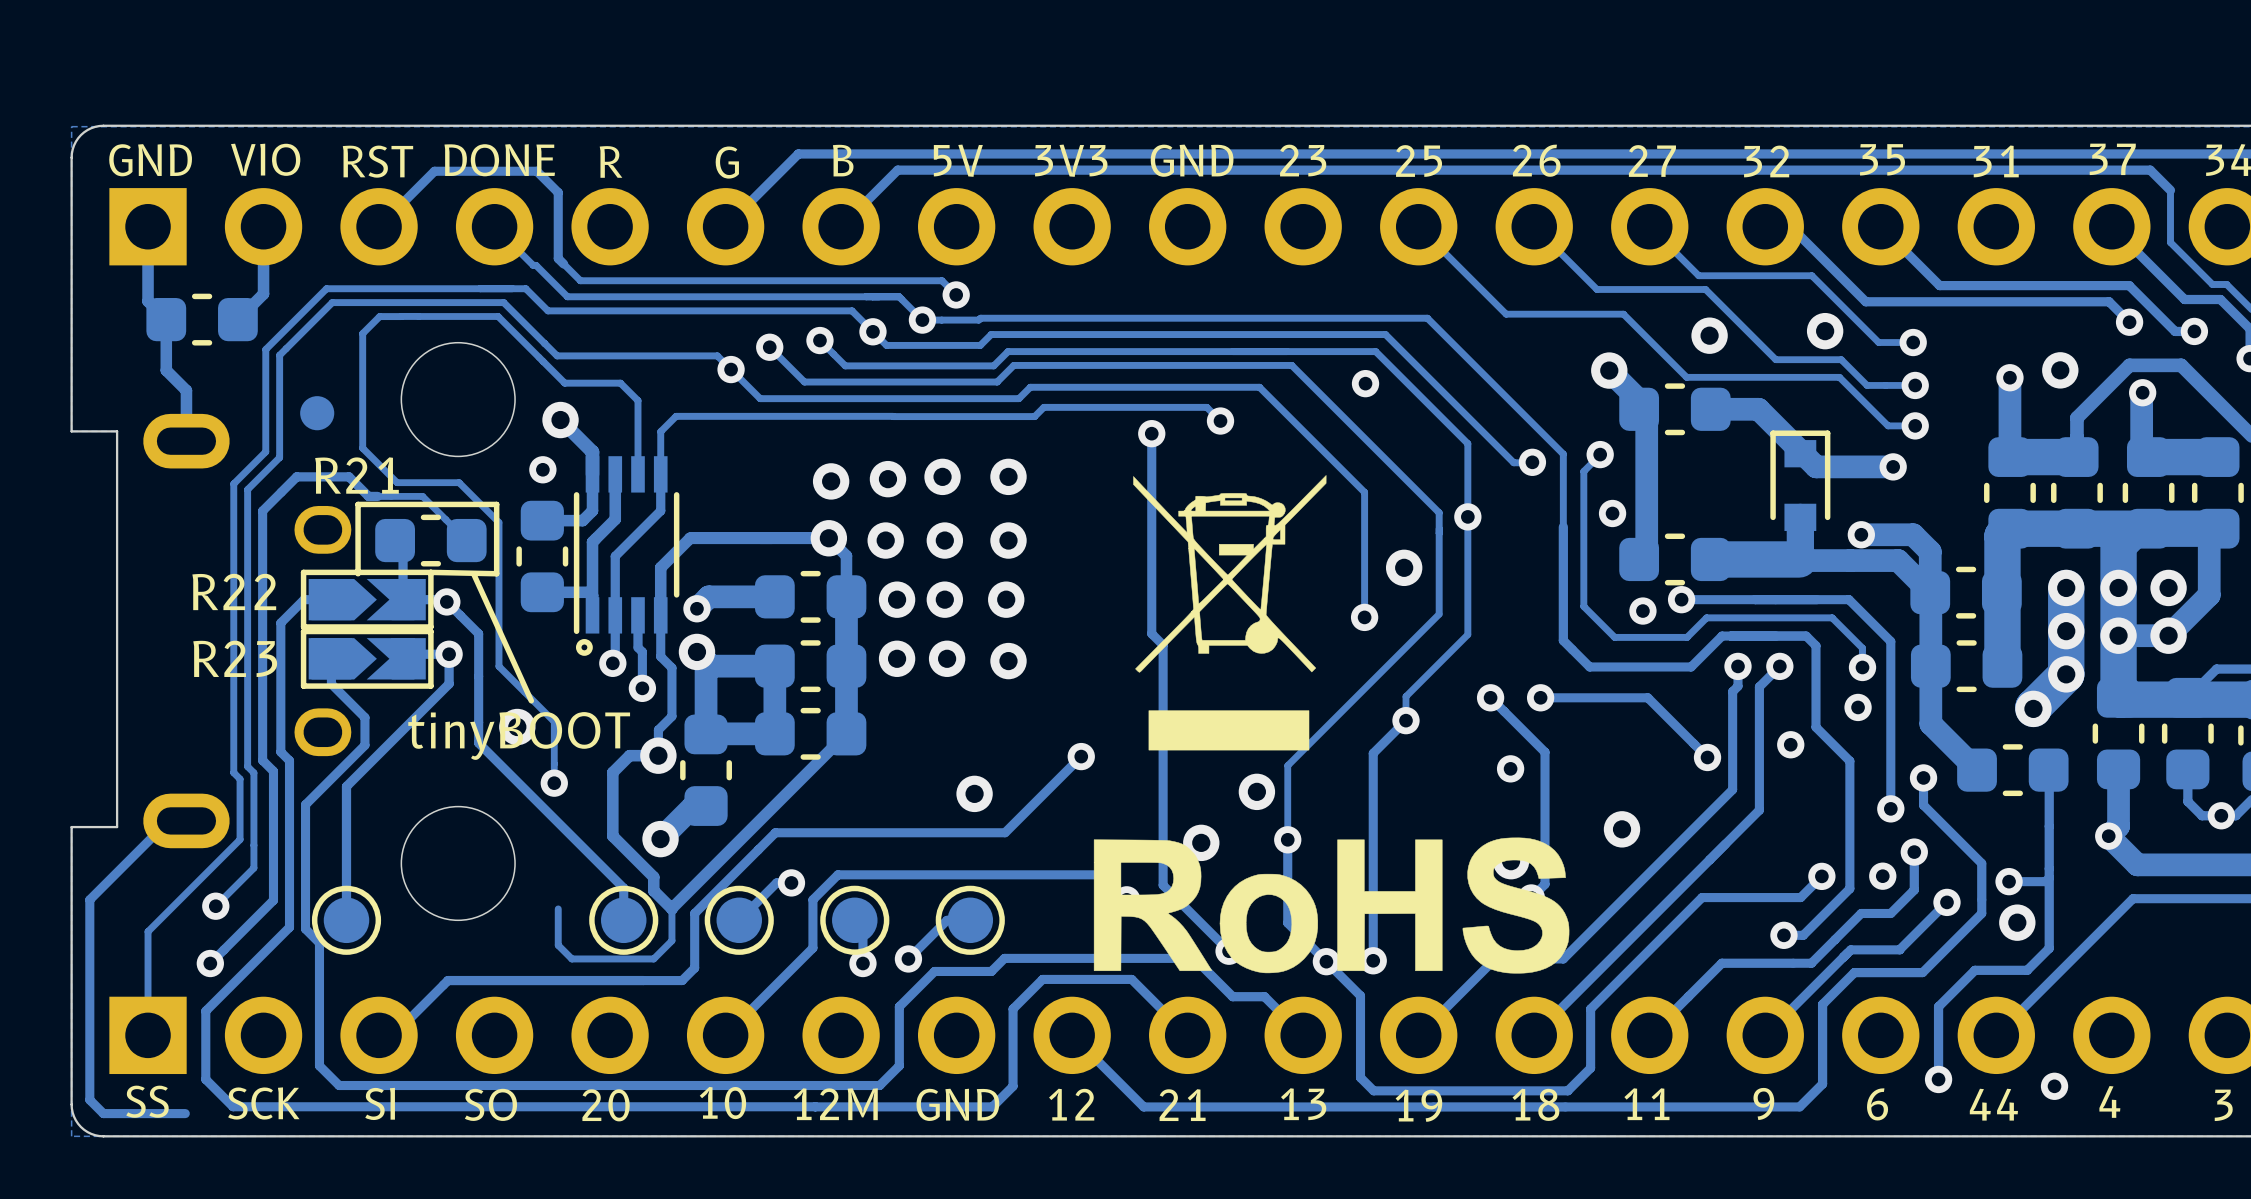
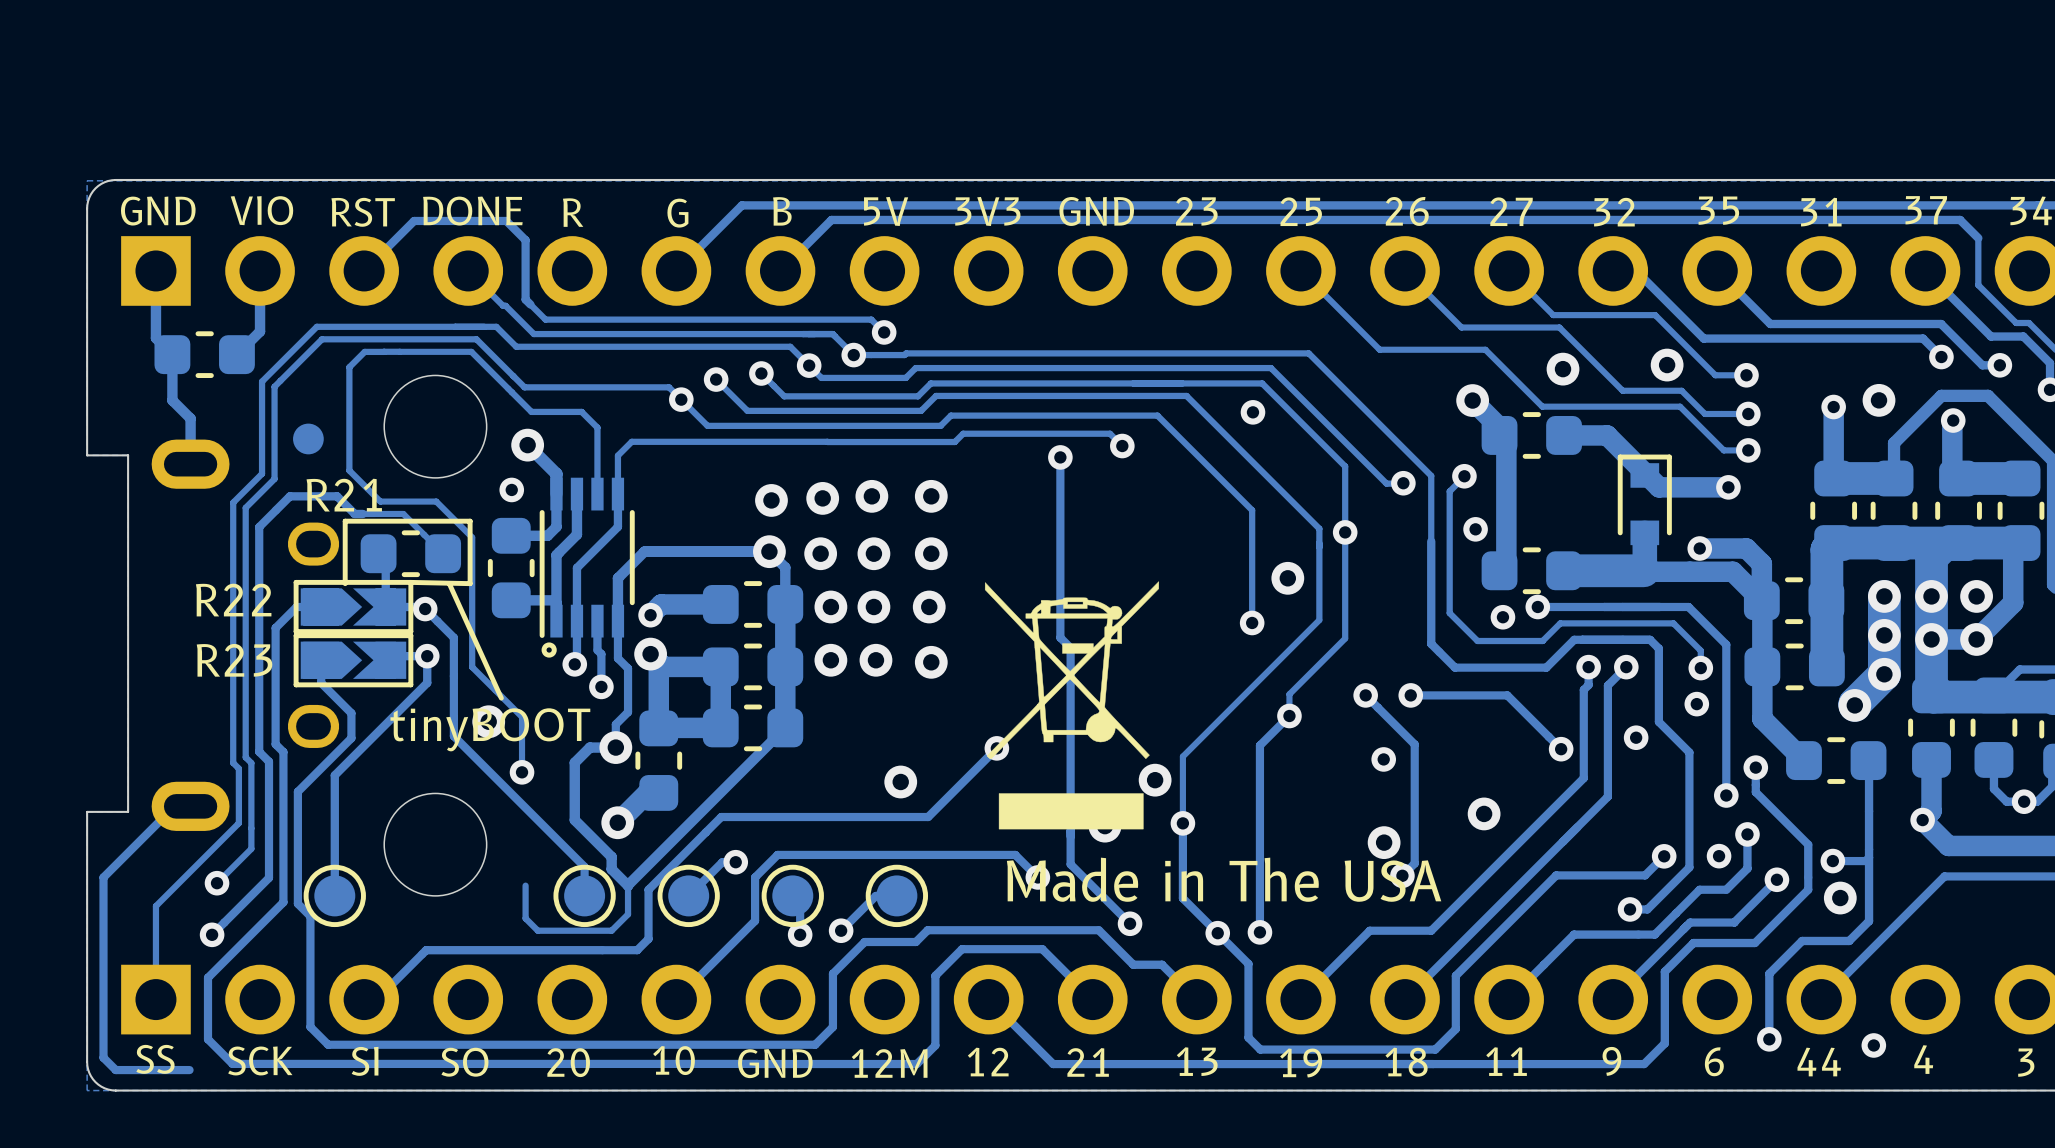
drawing position: (1229, 612) -> (1071, 705)
drawing: [1093, 837, 1570, 974] -> none
text: none -> Made in The USA (1224, 879)
text: 12M (835, 1104) -> GND (775, 1063)
text: GND (957, 1104) -> 12M (889, 1063)

